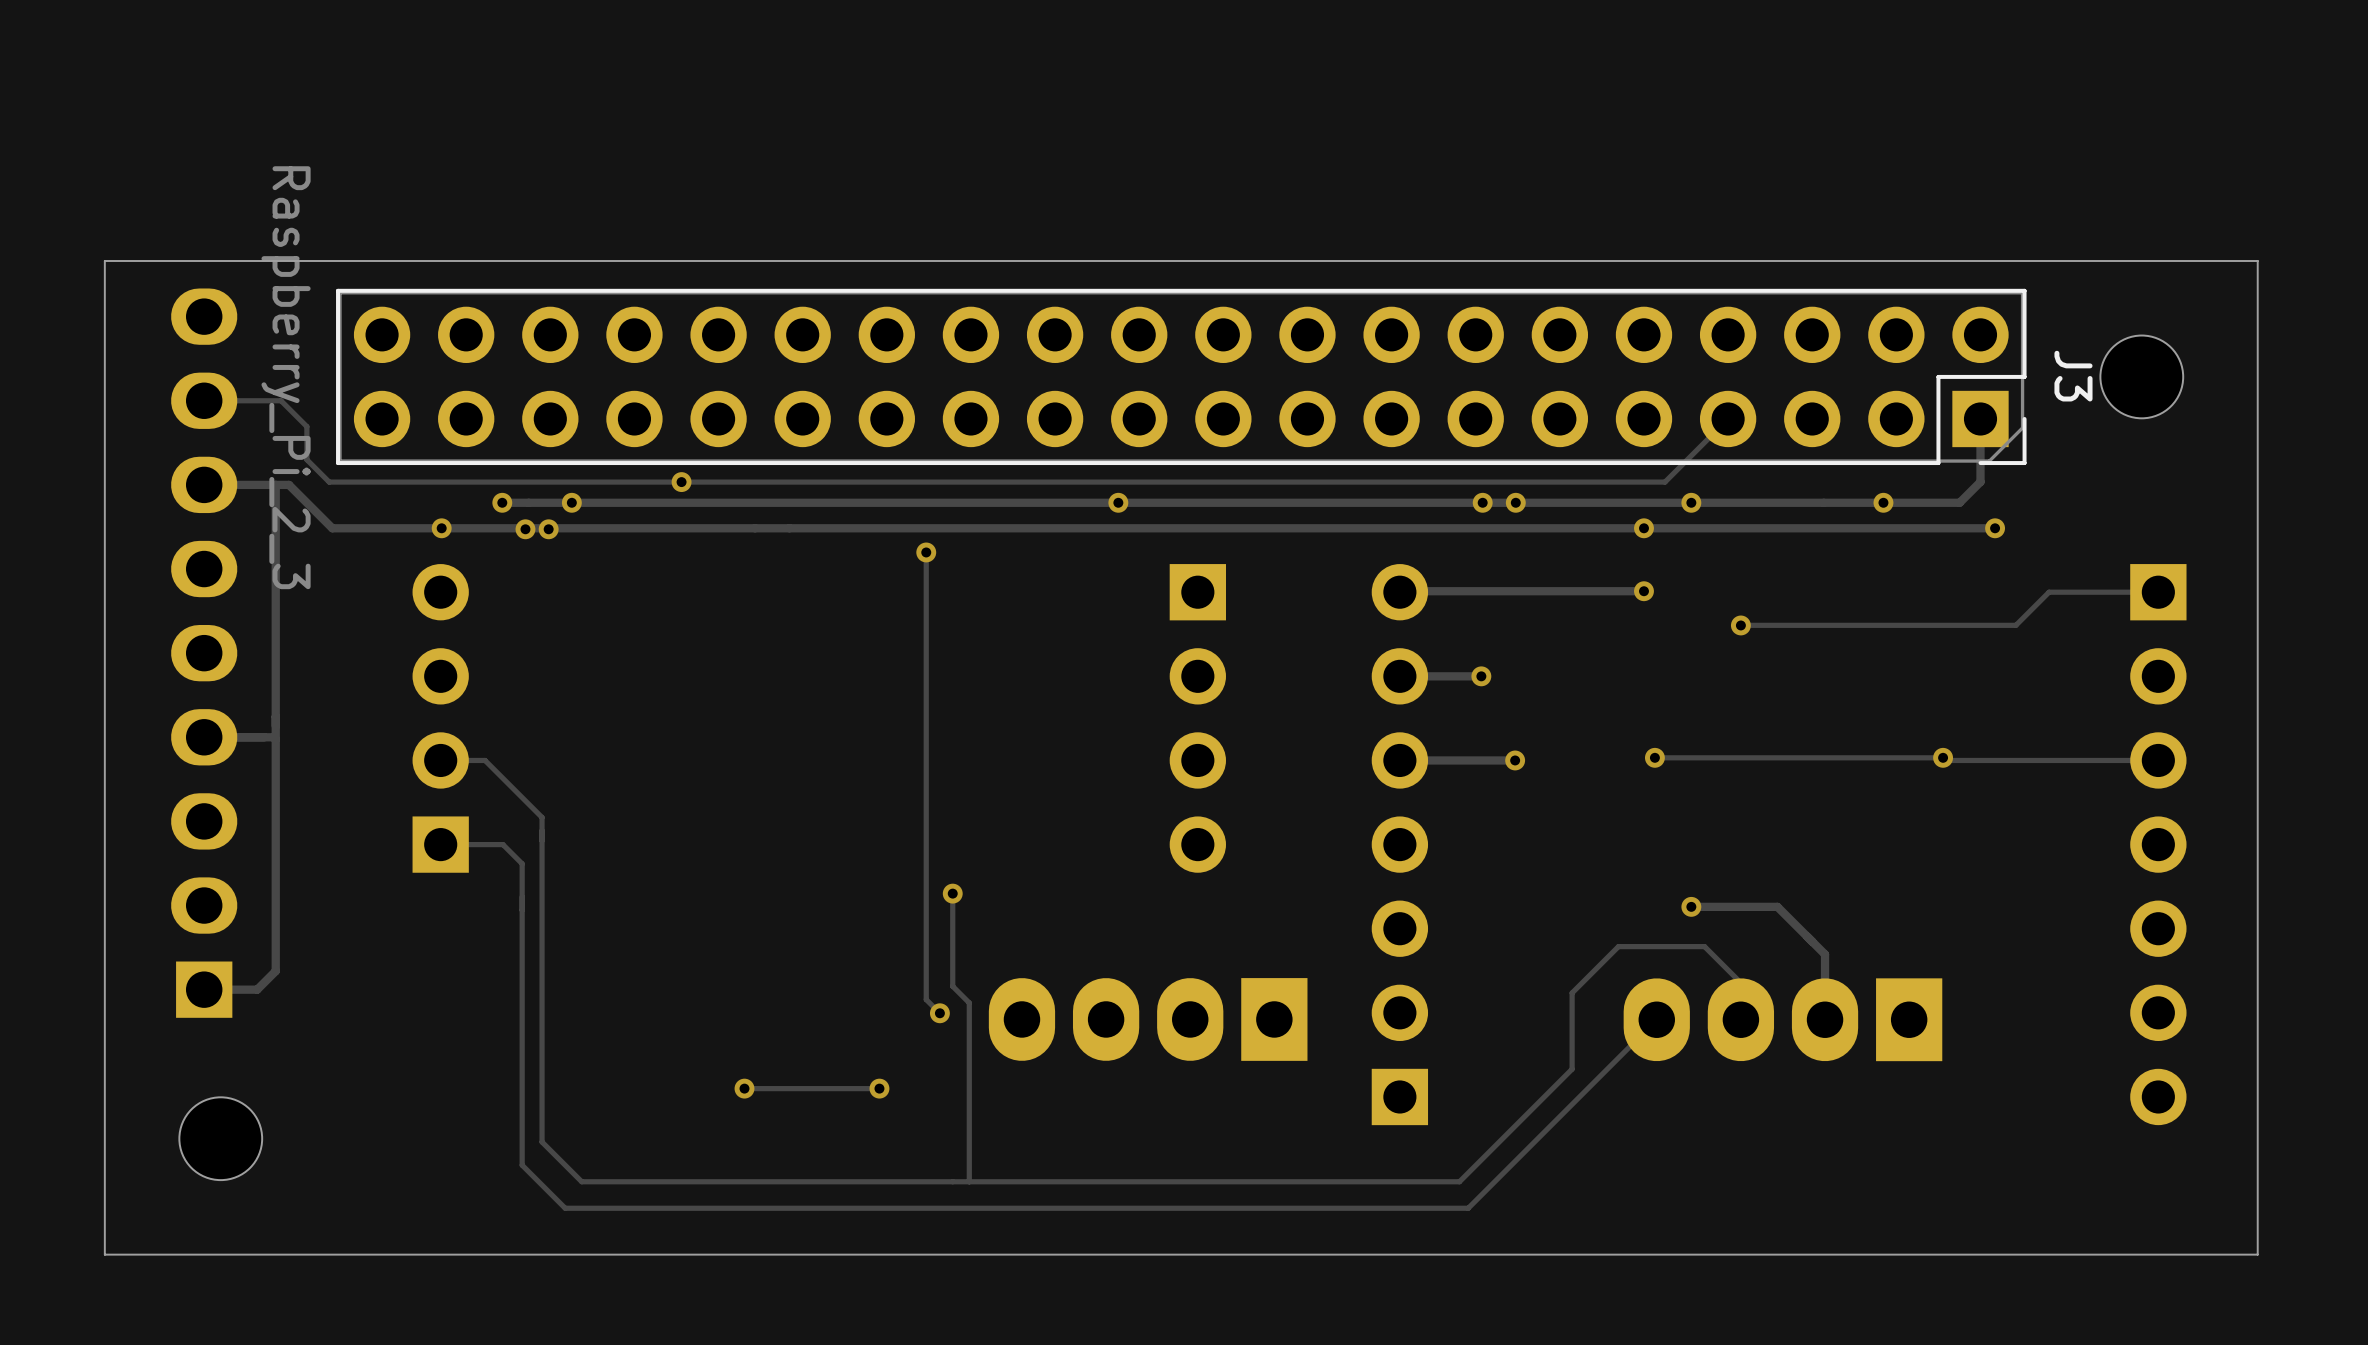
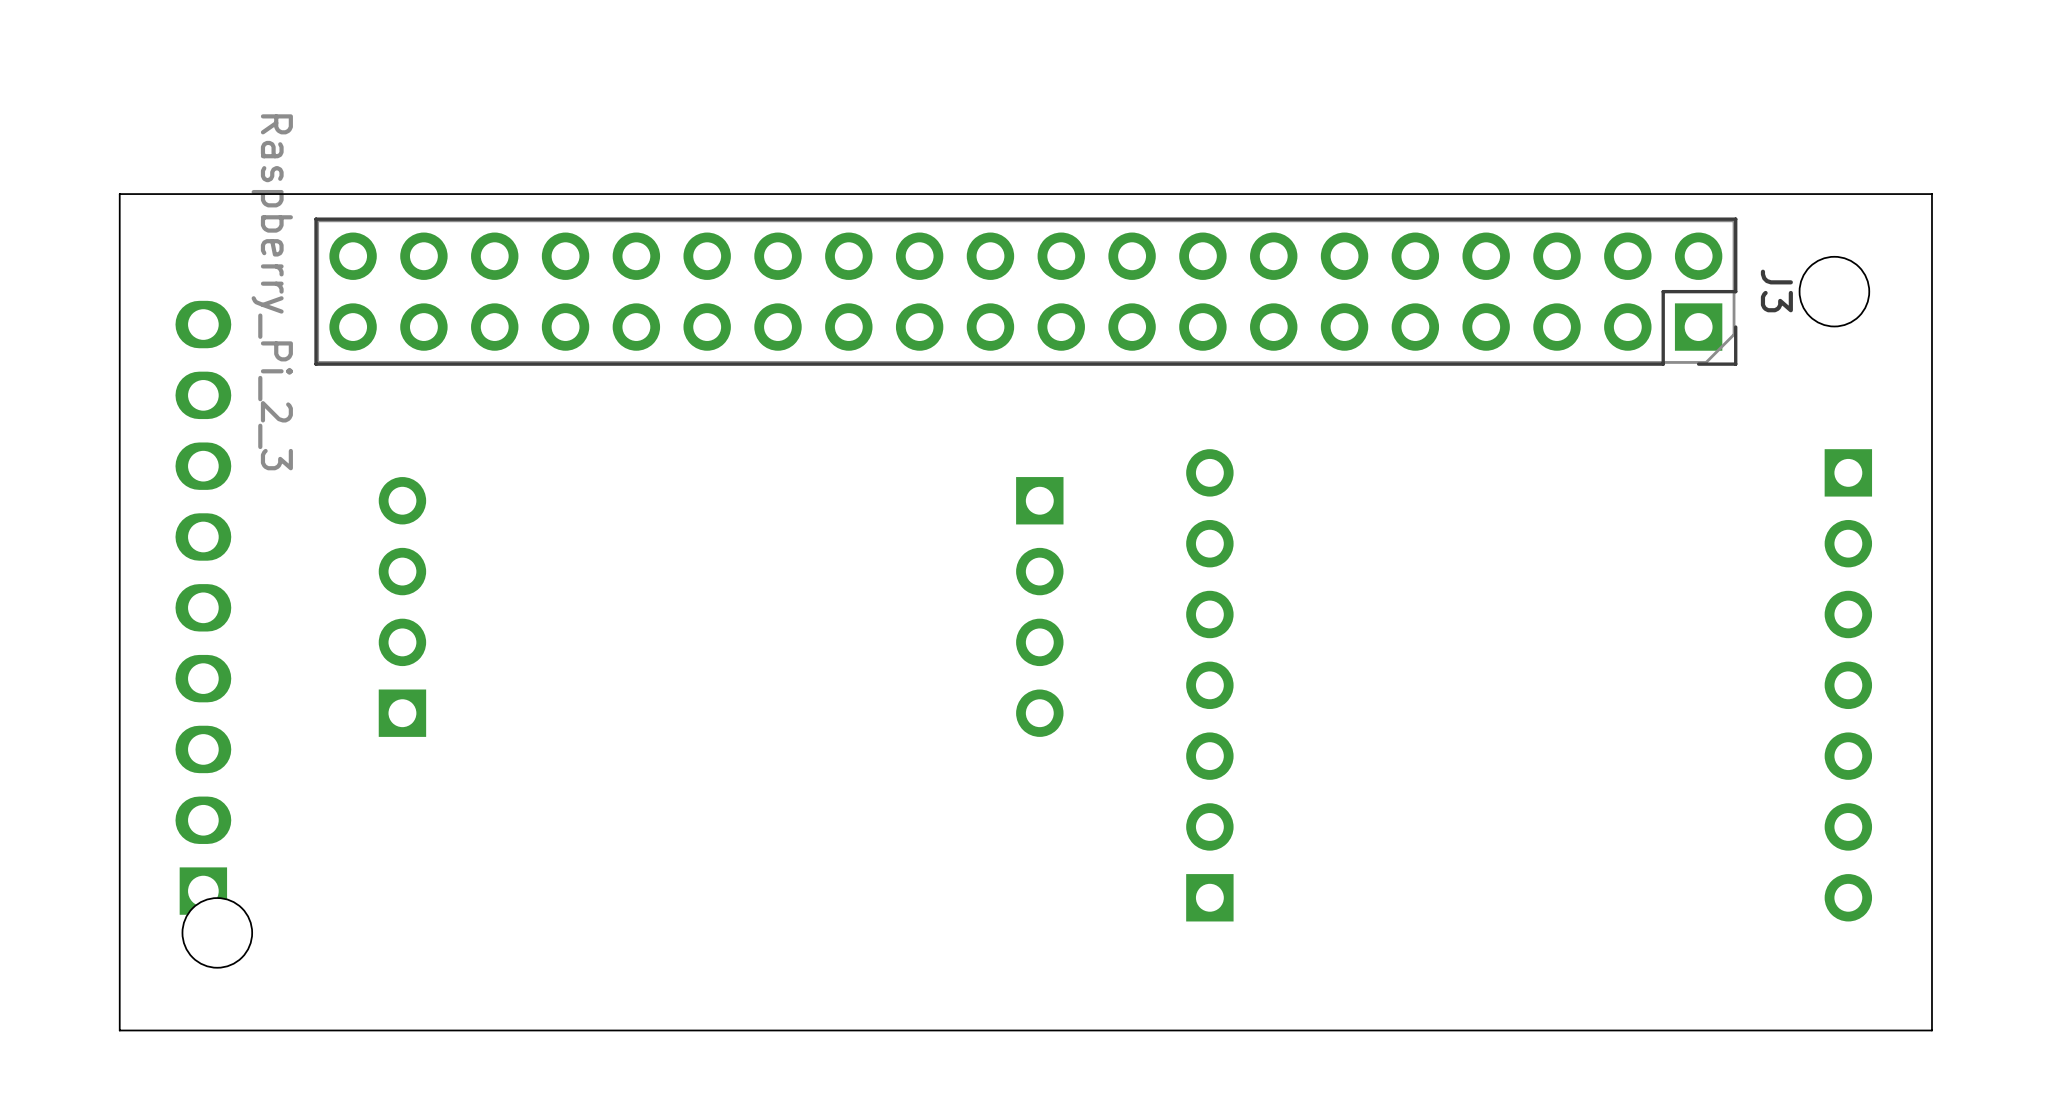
track: (204, 400) (281, 400) (306, 426) (306, 459) (329, 482) (1665, 482) (1728, 418) -> none
track: (1980, 418) (1980, 481) (1959, 502) (502, 502) -> none
via: (681, 482) -> none
track: (204, 484) (289, 484) (332, 528) (1995, 528) -> none
track: (275, 484) (275, 971) (257, 989) (204, 989) -> none
via: (502, 502) -> none
via: (571, 502) -> none
via: (1118, 502) -> none
via: (1482, 502) -> none
via: (1515, 502) -> none
via: (1691, 502) -> none
via: (1883, 502) -> none
via: (441, 528) -> none
via: (1643, 528) -> none
via: (1995, 528) -> none
via: (525, 529) -> none
via: (548, 529) -> none
track: (926, 552) (926, 999) (939, 1013) -> none
via: (926, 552) -> none
track: (1643, 591) (1399, 592) -> none
via: (1643, 591) -> none
track: (2158, 592) (2049, 592) (2015, 625) (1741, 625) -> none
via: (1740, 625) -> none
part position: (204, 653) -> (203, 607)
track: (1481, 676) (1399, 676) -> none
via: (1481, 676) -> none
part position: (440, 718) -> (402, 606)
part position: (1197, 718) -> (1039, 606)
track: (204, 737) (273, 737) (275, 739) -> none
track: (1654, 757) (1943, 757) (1945, 760) (2158, 760) -> none
via: (1654, 757) -> none
via: (1943, 757) -> none
track: (440, 760) (485, 760) (542, 817) (542, 1142) (581, 1181) (1459, 1181) (1572, 1069) (1572, 992) (1618, 946) (1704, 946) (1740, 982) (1740, 1019) -> none
track: (1515, 760) (1399, 760) -> none
via: (1515, 760) -> none
track: (440, 844) (502, 844) (522, 863) (522, 1165) (565, 1208) (1468, 1208) (1656, 1019) -> none
track: (952, 893) (952, 986) (969, 1002) (969, 1181) -> none
via: (952, 893) -> none
track: (1691, 906) (1777, 906) (1825, 954) (1825, 1019) -> none
via: (1691, 906) -> none
via: (939, 1013) -> none
part: (1148, 1019) -> none
part: (1782, 1019) -> none
via: (744, 1088) -> none
track: (879, 1088) (744, 1088) -> none
via: (879, 1088) -> none

